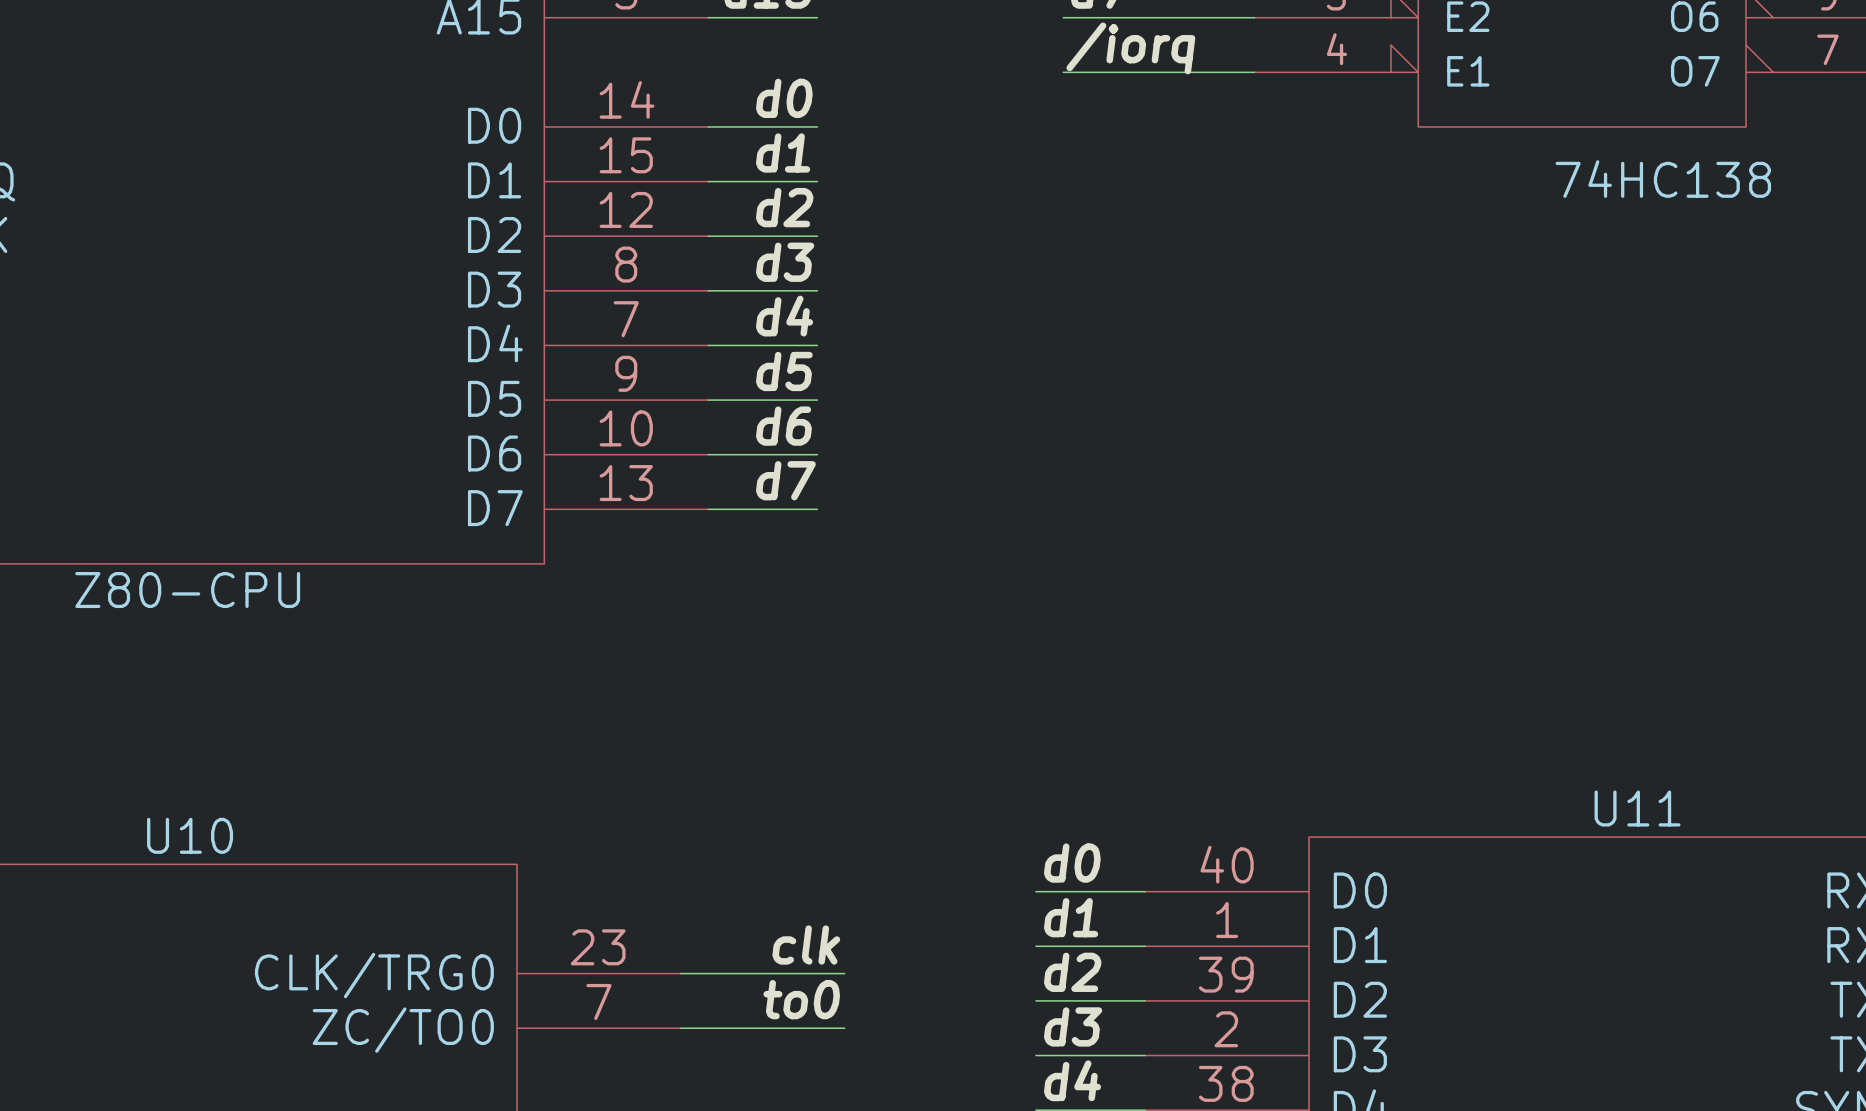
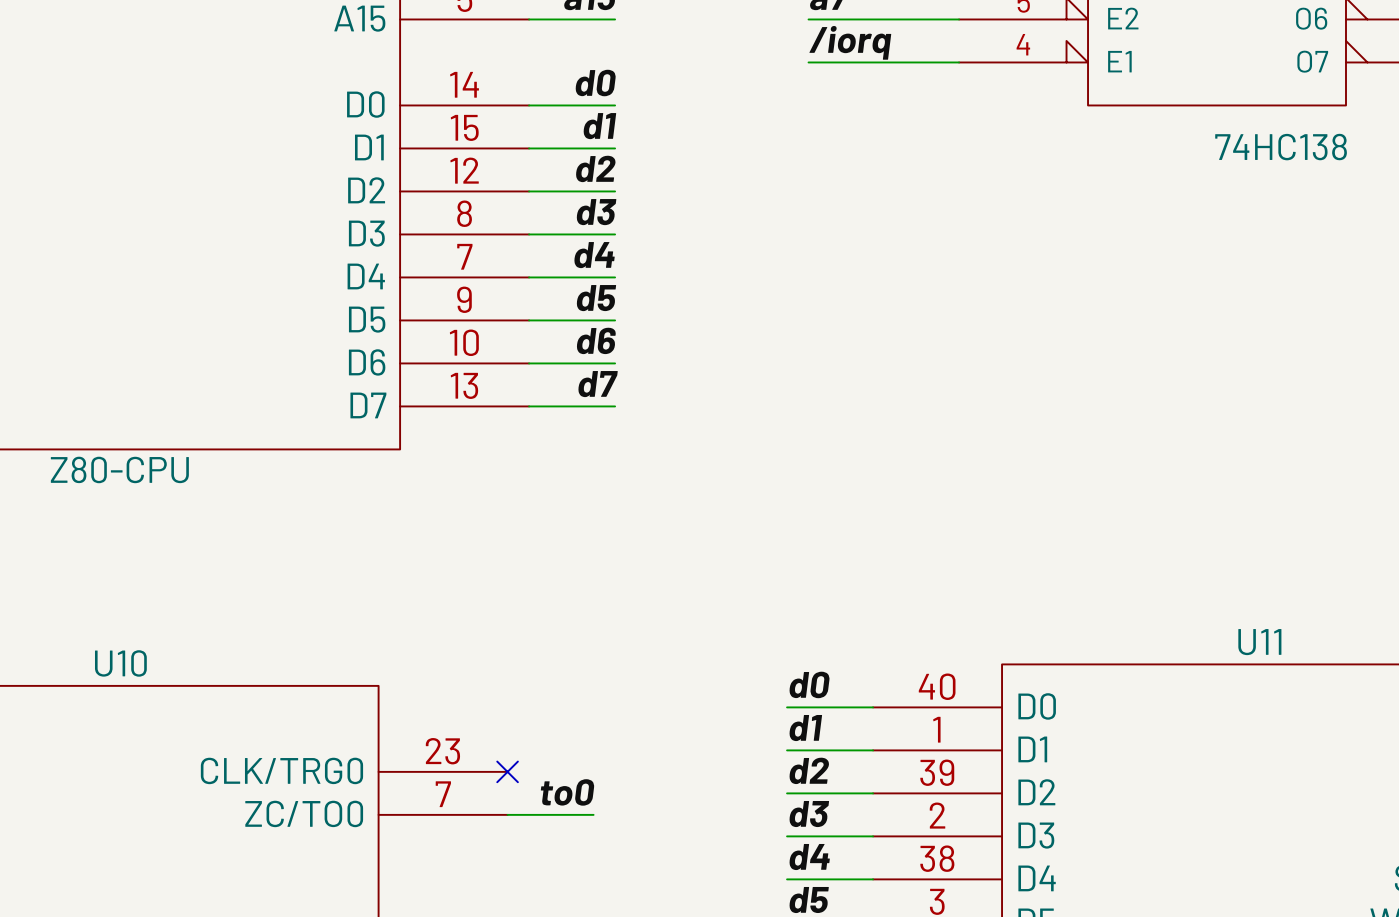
label: clk (806, 945) -> none
wire: (680, 973) (844, 973) -> none
no-connect mark: none -> (507, 771)
label position: to0 (801, 999) -> to0 (567, 792)
wire: (790, 1028) (844, 1028) -> none

